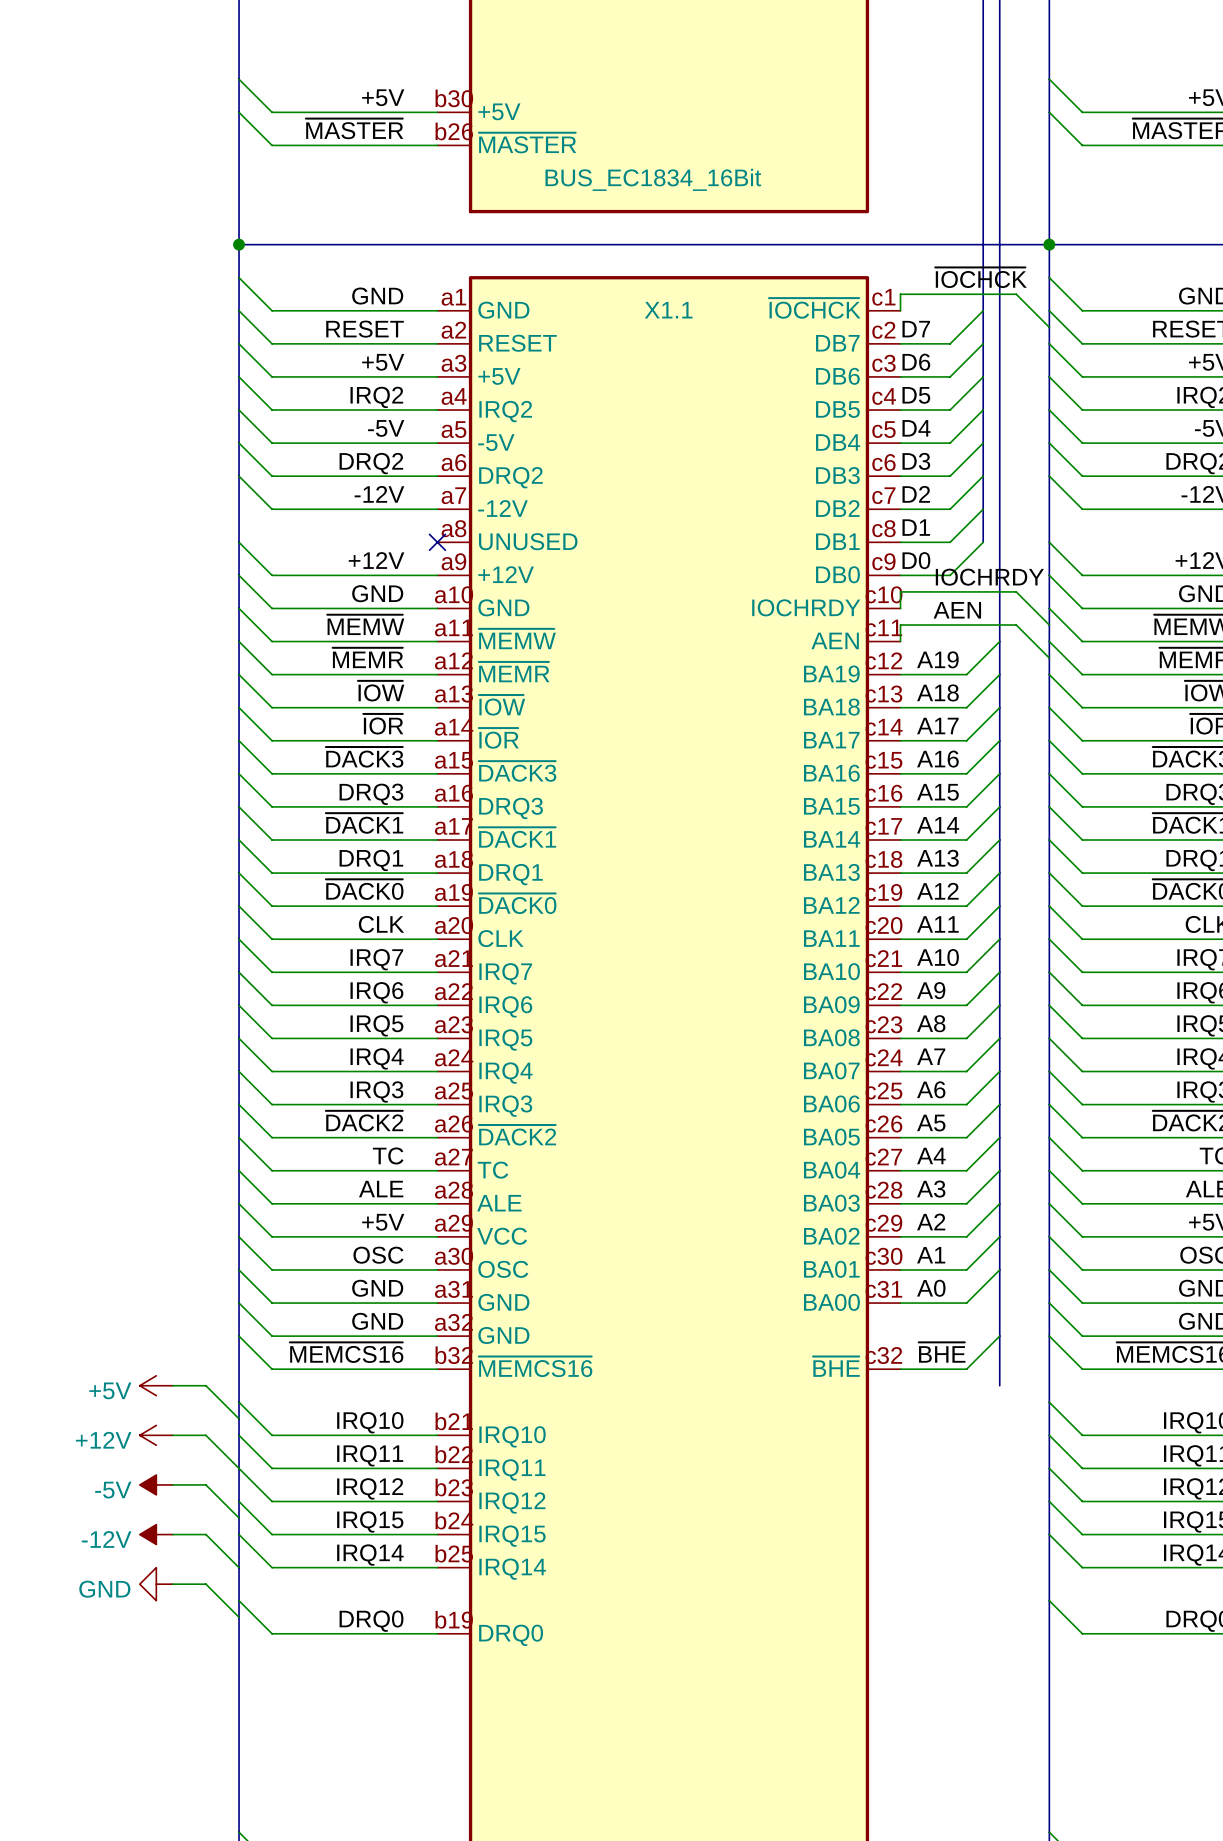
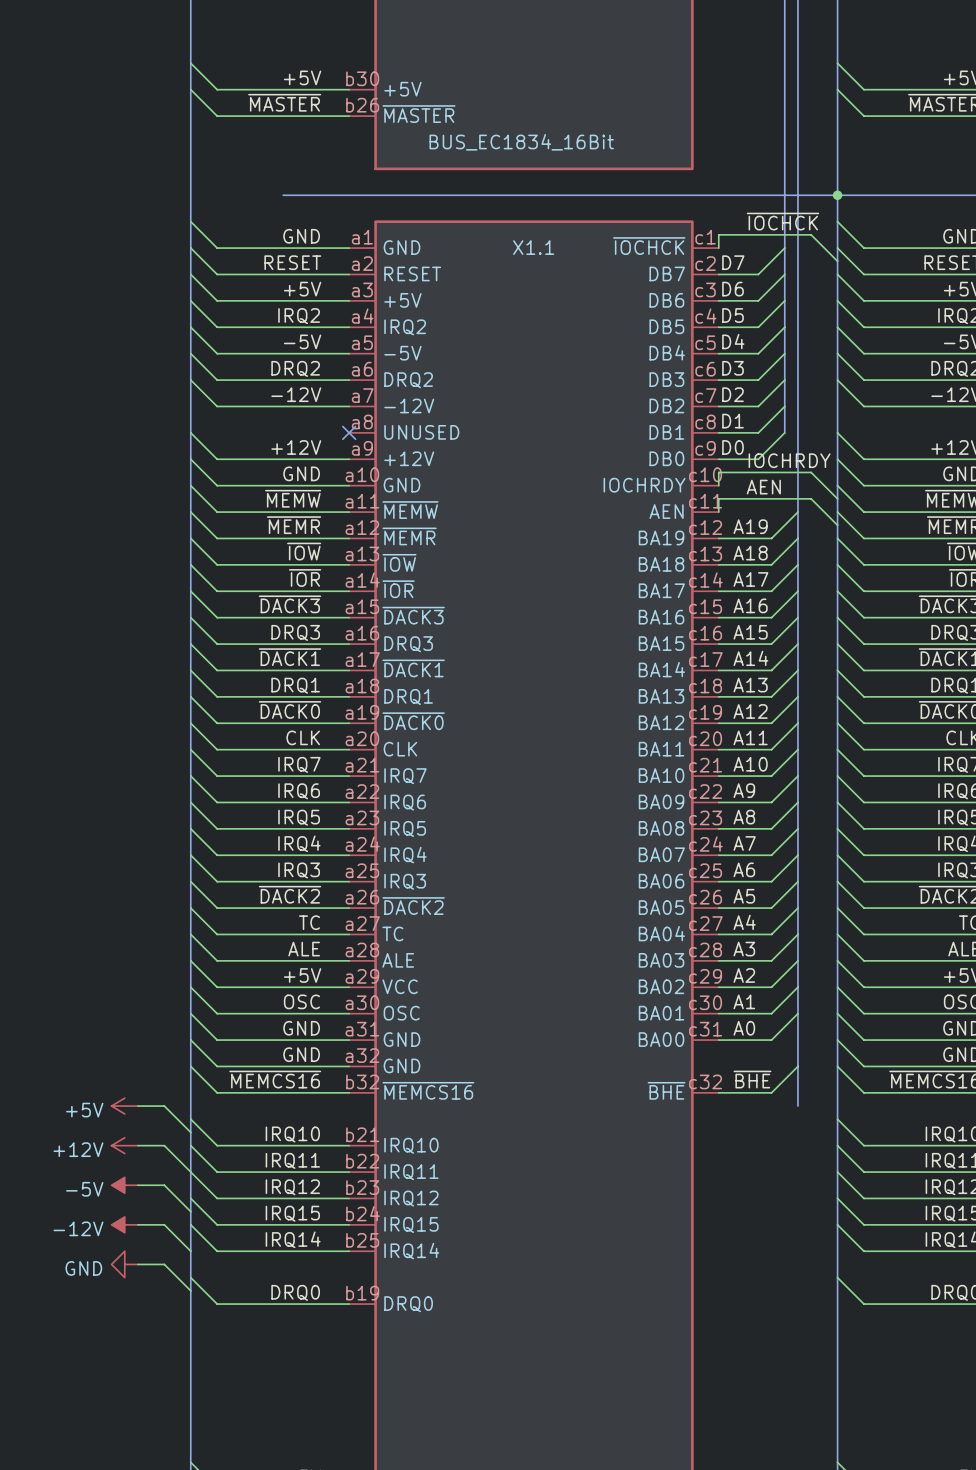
bus: (239, 244) (354, 244) -> none
junction: (239, 244) -> none

